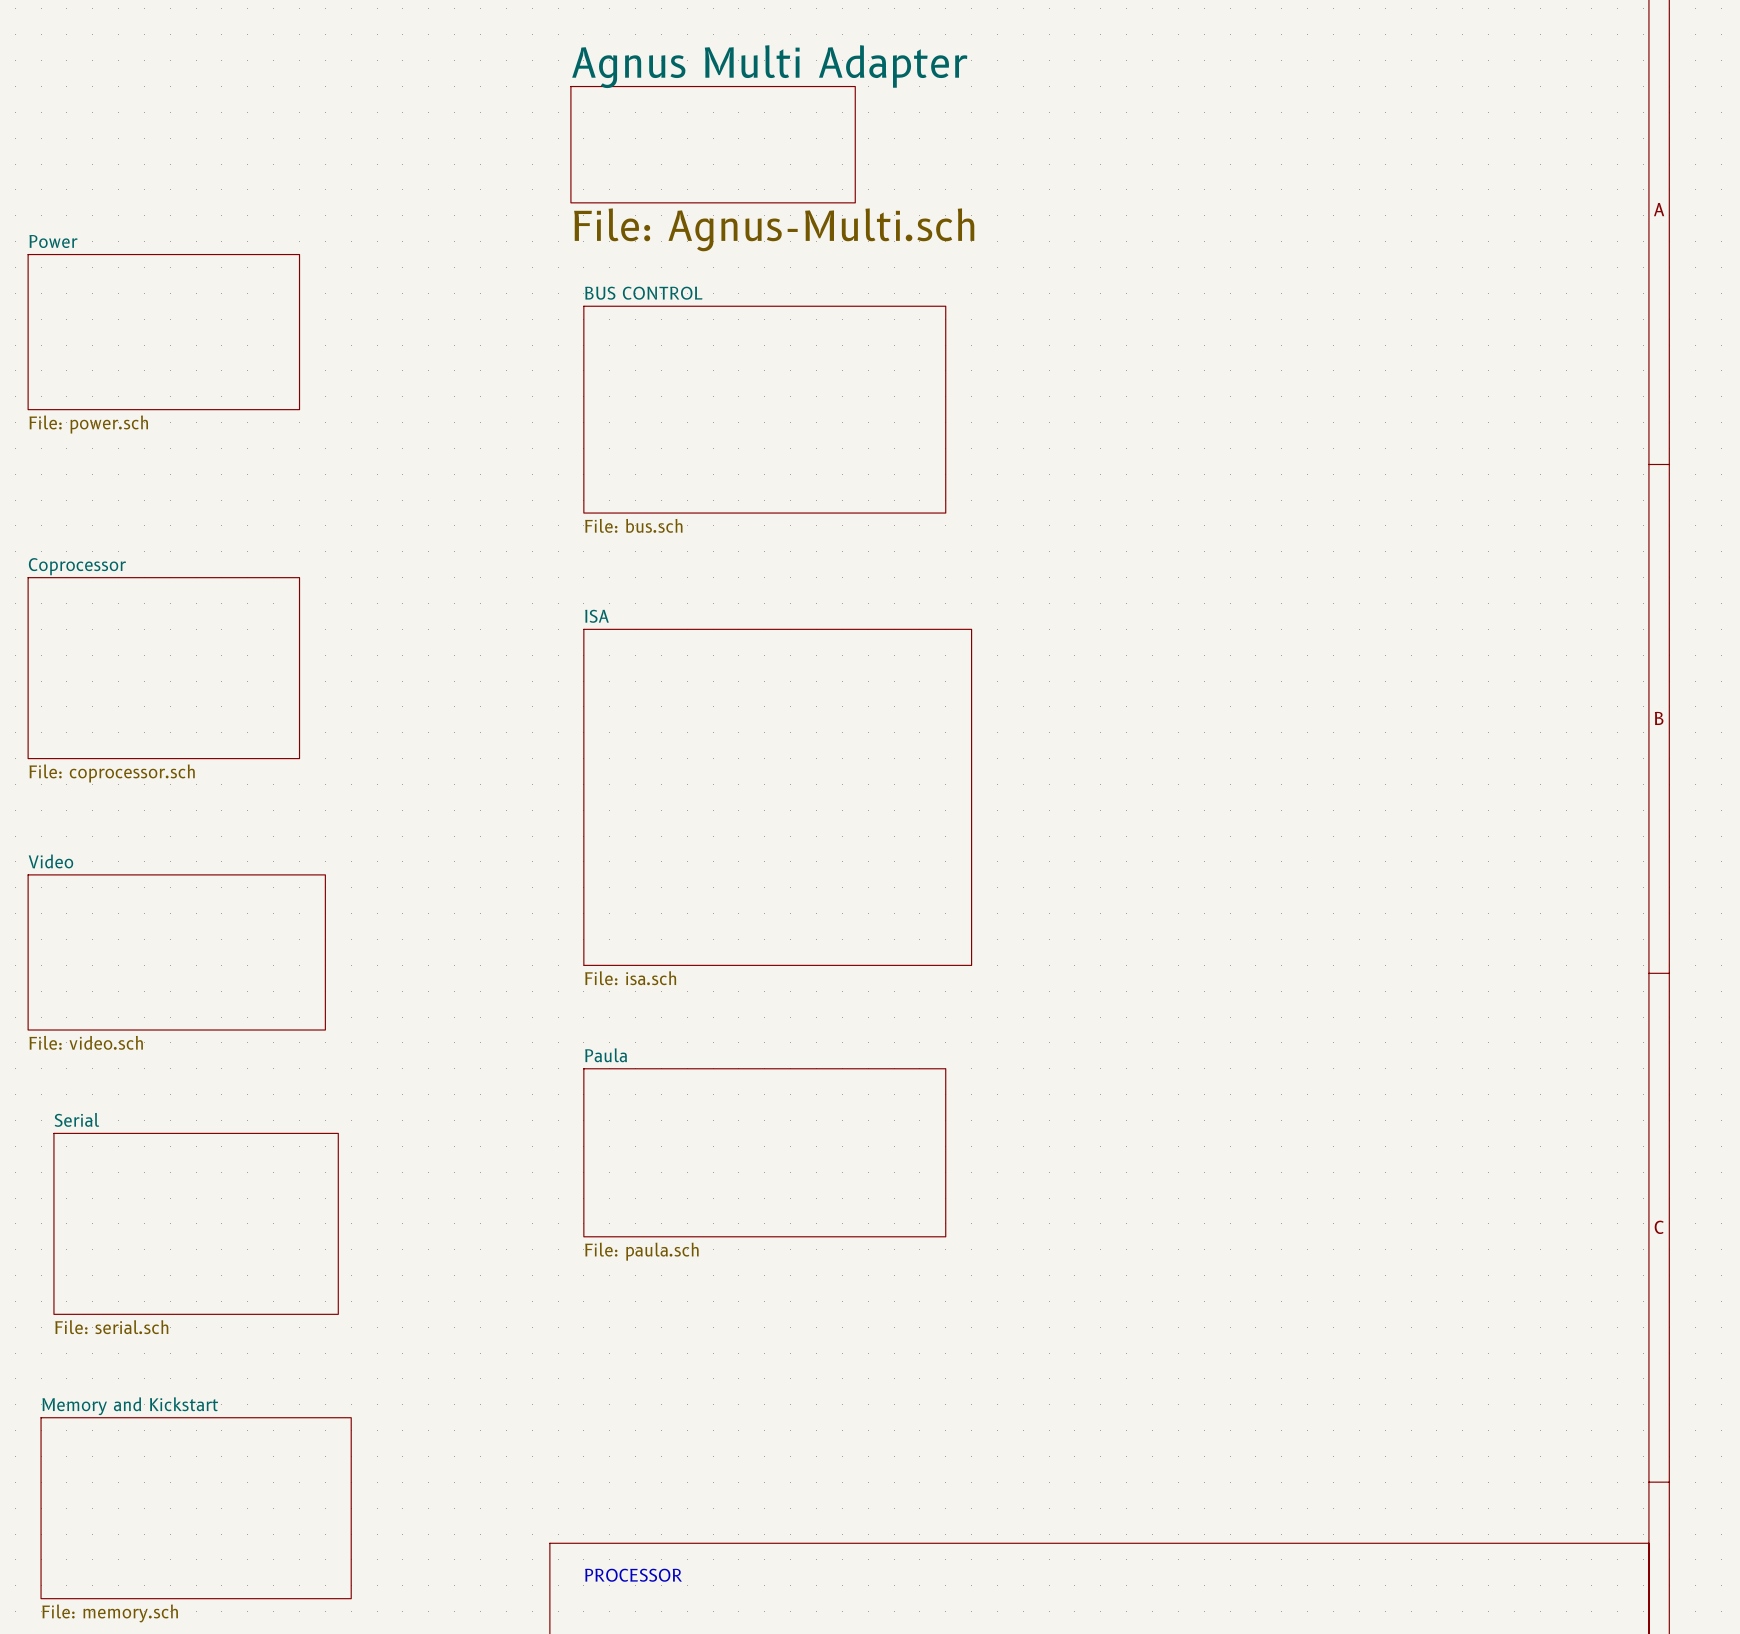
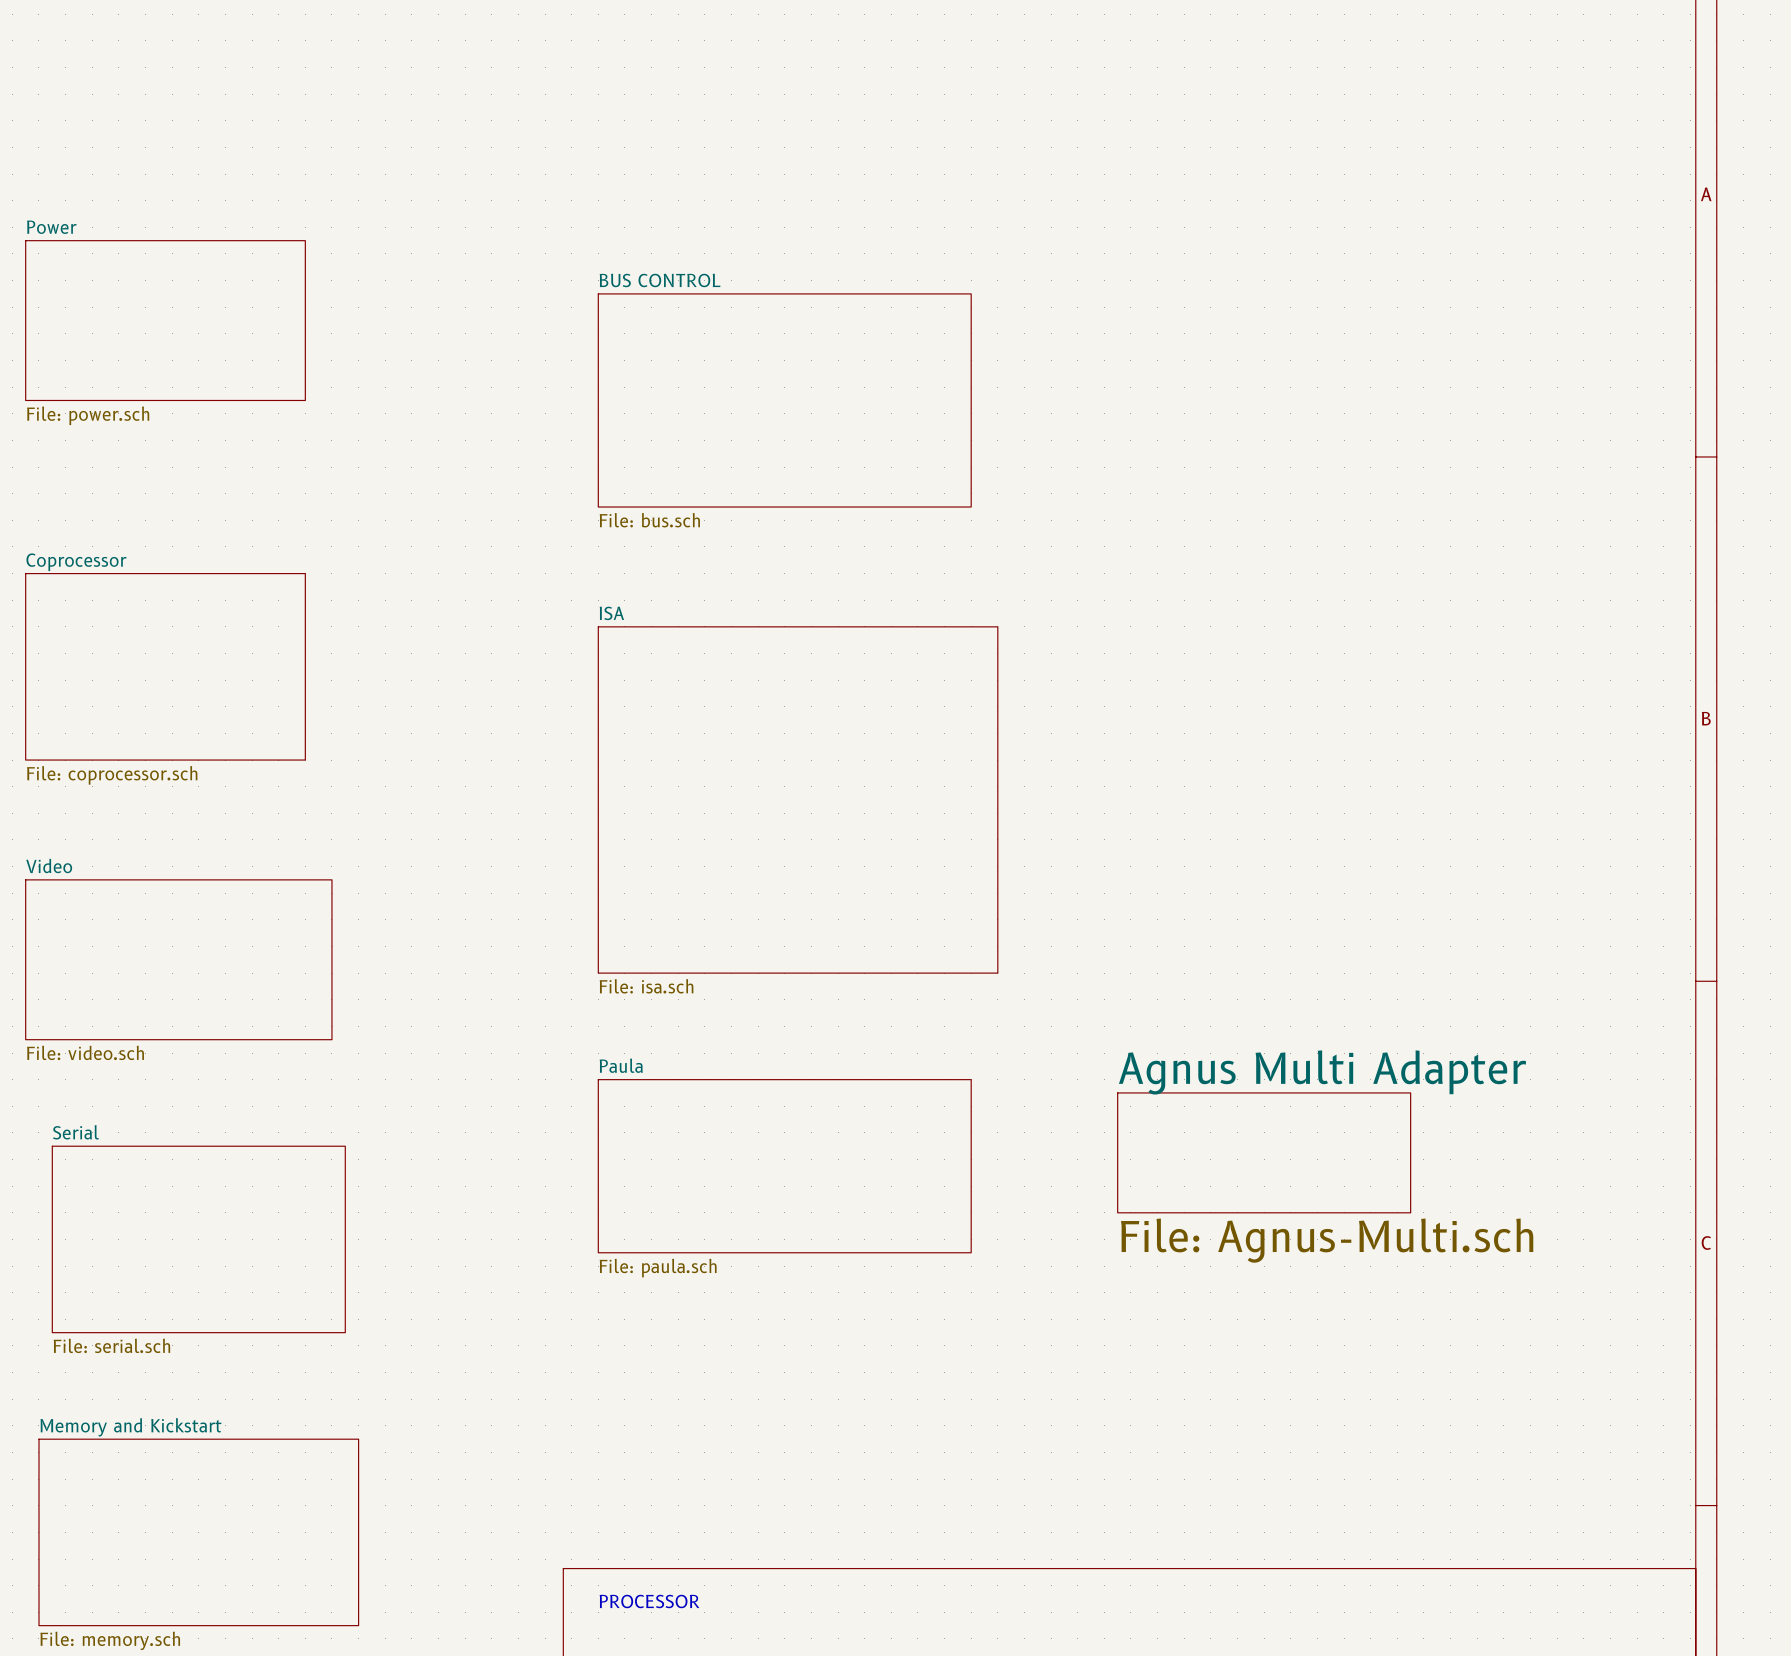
sheet Agnus Multi Adapter: File: Agnus-Multi.sch (713, 144) -> none
sheet Agnus Multi Adapter: none -> File: Agnus-Multi.sch (1264, 1152)

